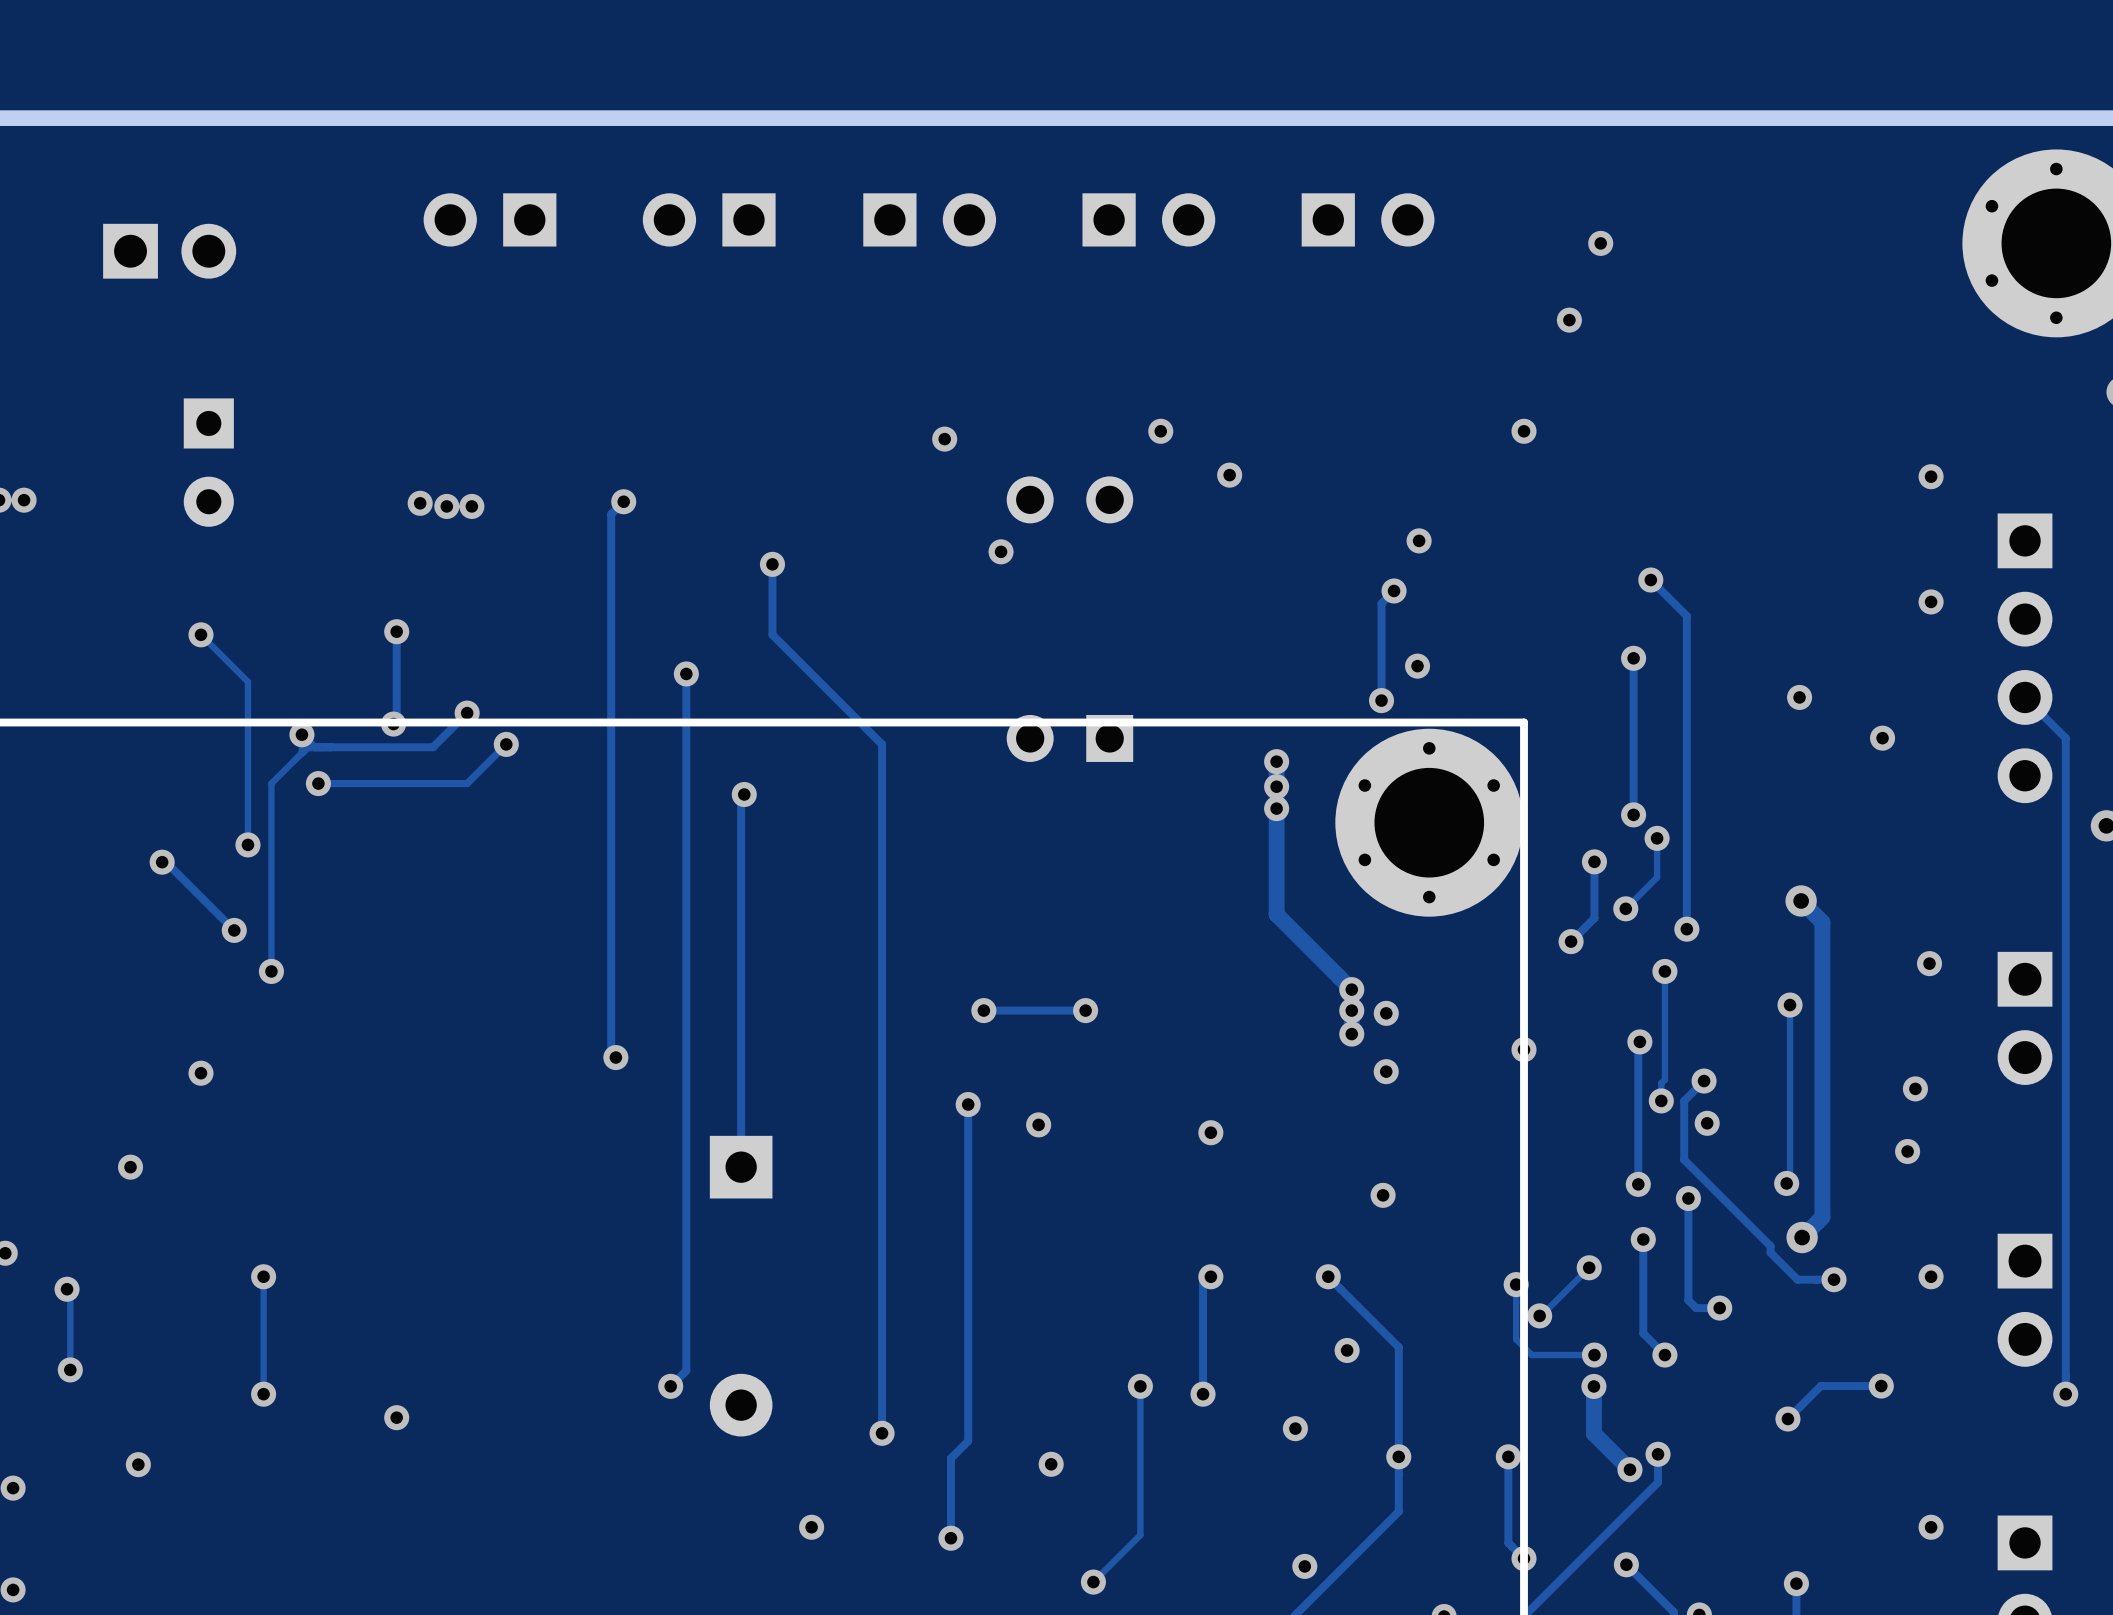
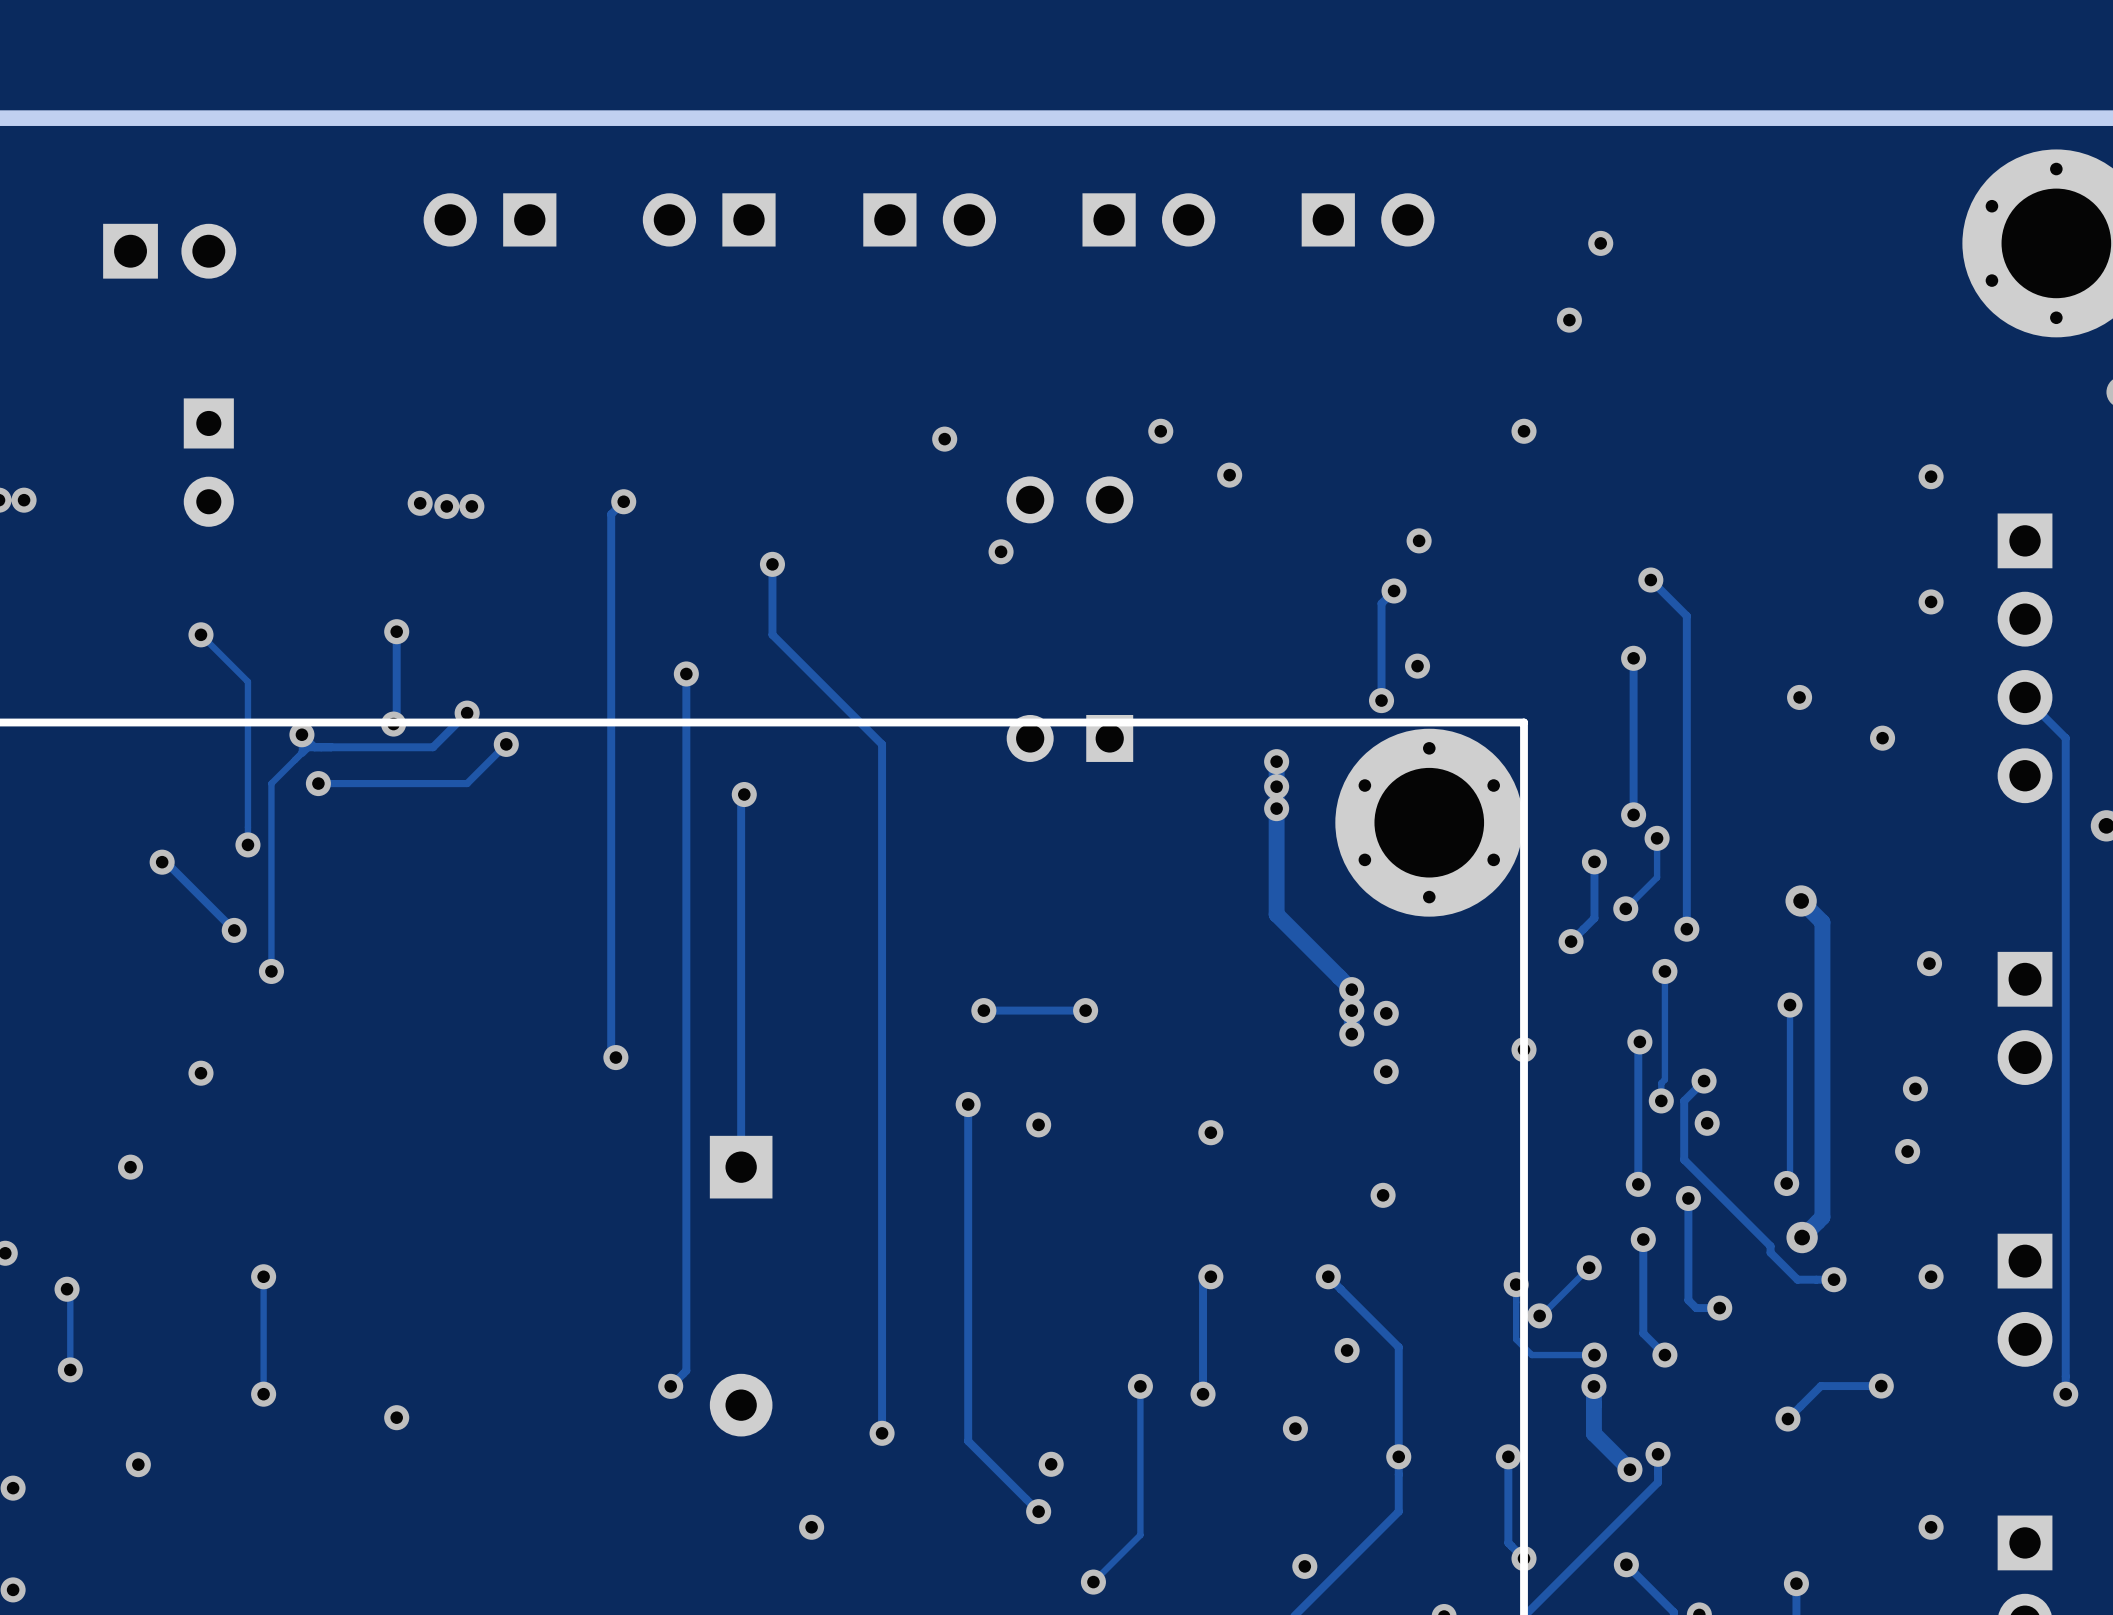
track: (968, 1441) (950, 1458) (950, 1538) -> (968, 1441) (1038, 1511)
via position: (950, 1538) -> (1038, 1511)

